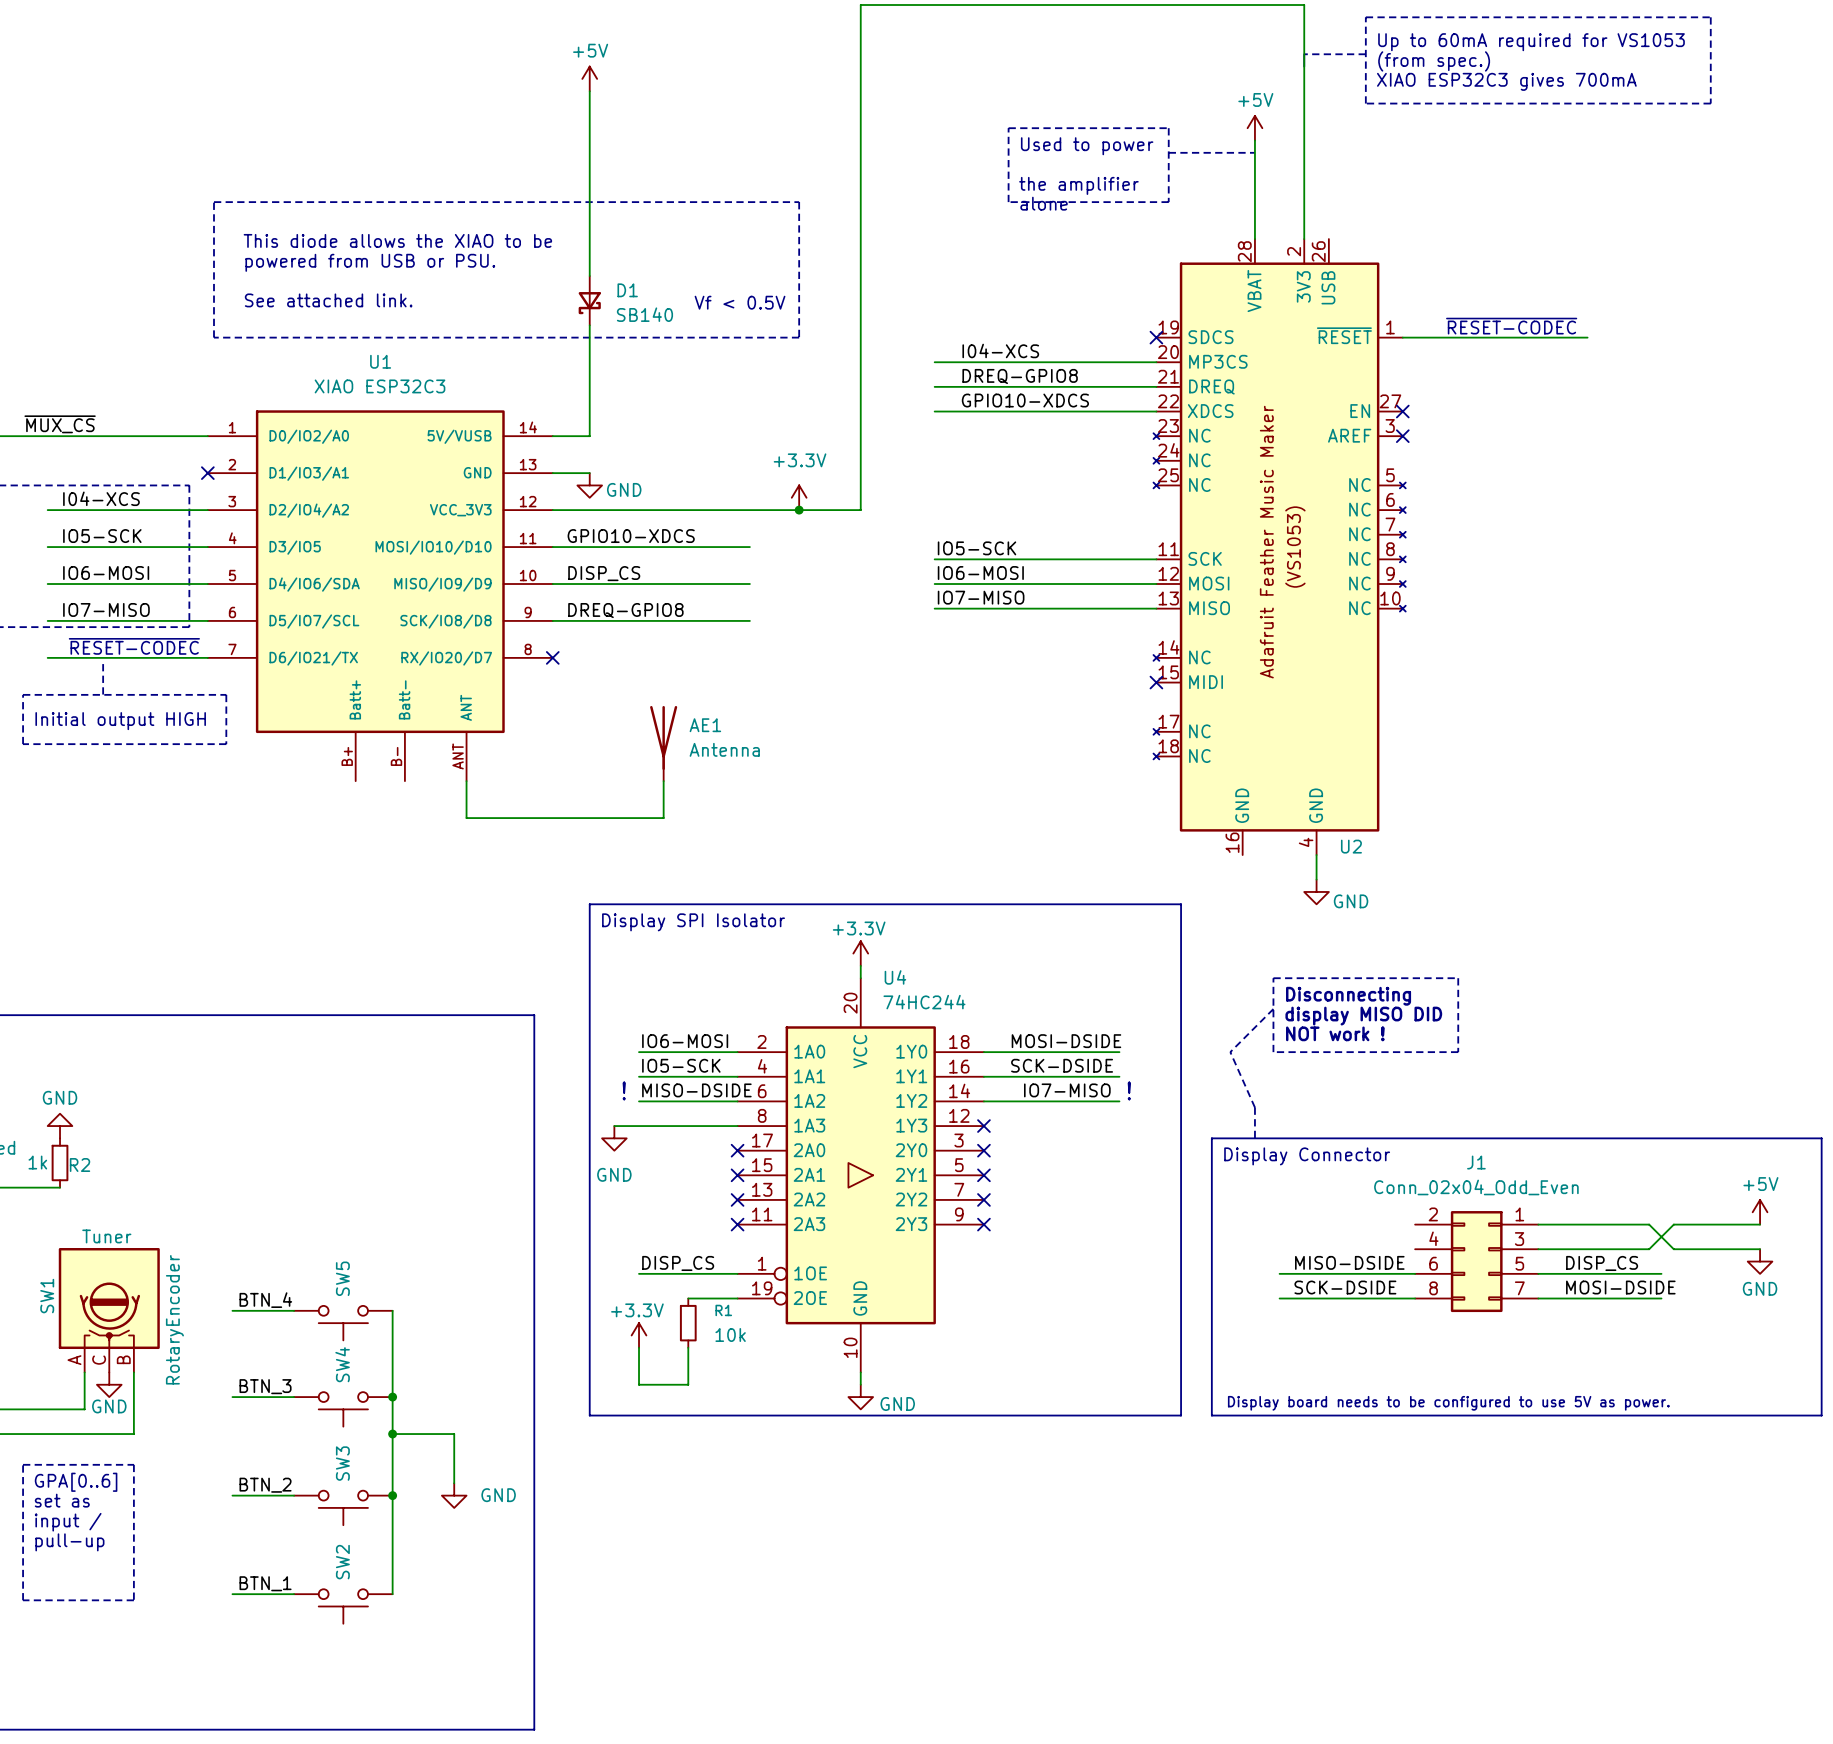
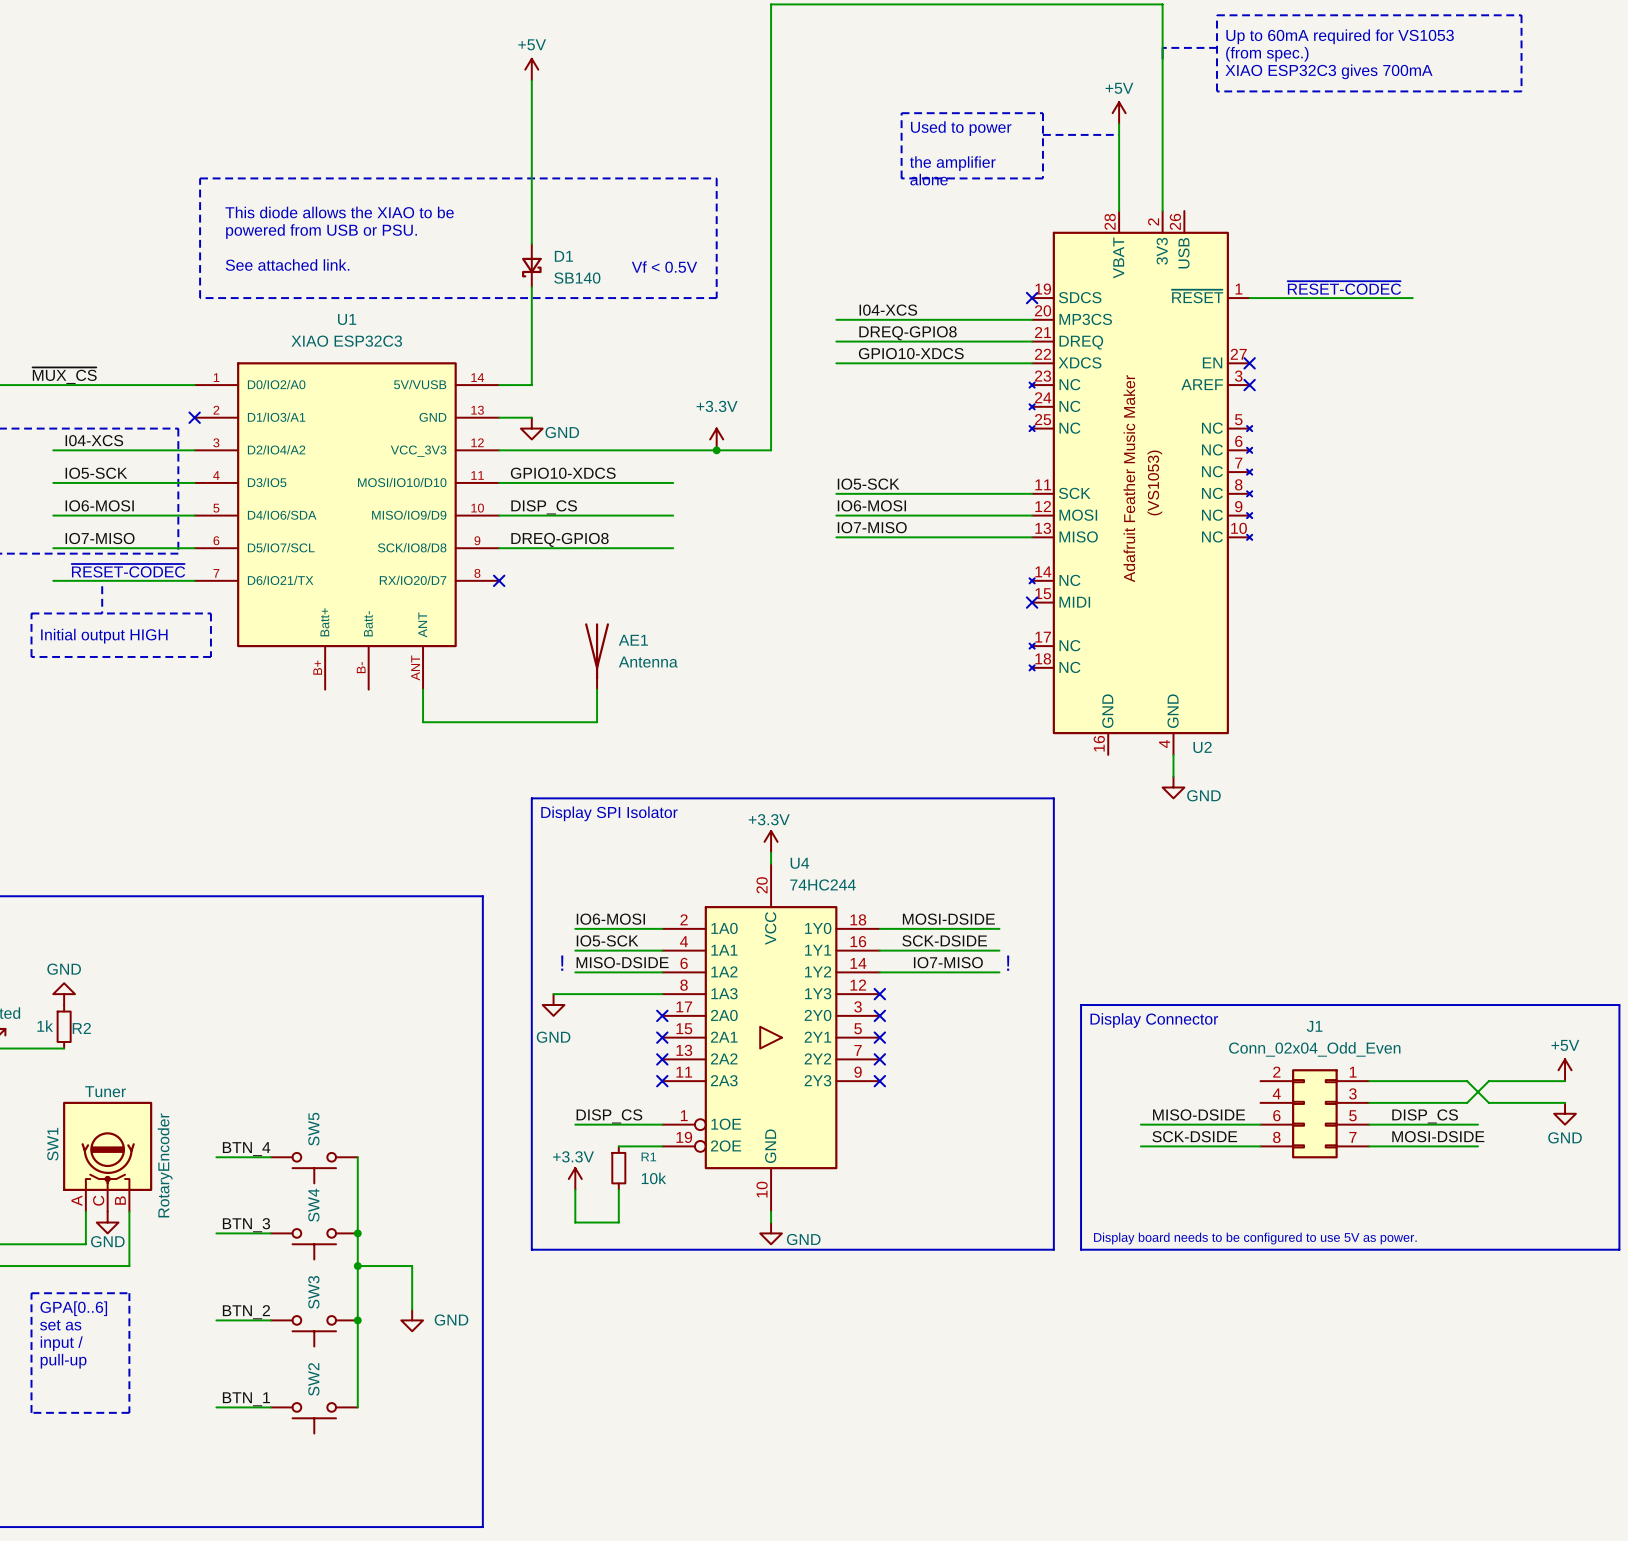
line: (1273, 978) (1458, 978) (1458, 1052) (1273, 1052) (1273, 978) -> none
text: Disconnecting (1348, 996) -> none
line: (1273, 1009) (1230, 1052) (1254, 1107) (1254, 1138) -> none
text: display MISO DID (1363, 1016) -> none
text: NOT work ! (1335, 1033) -> none

